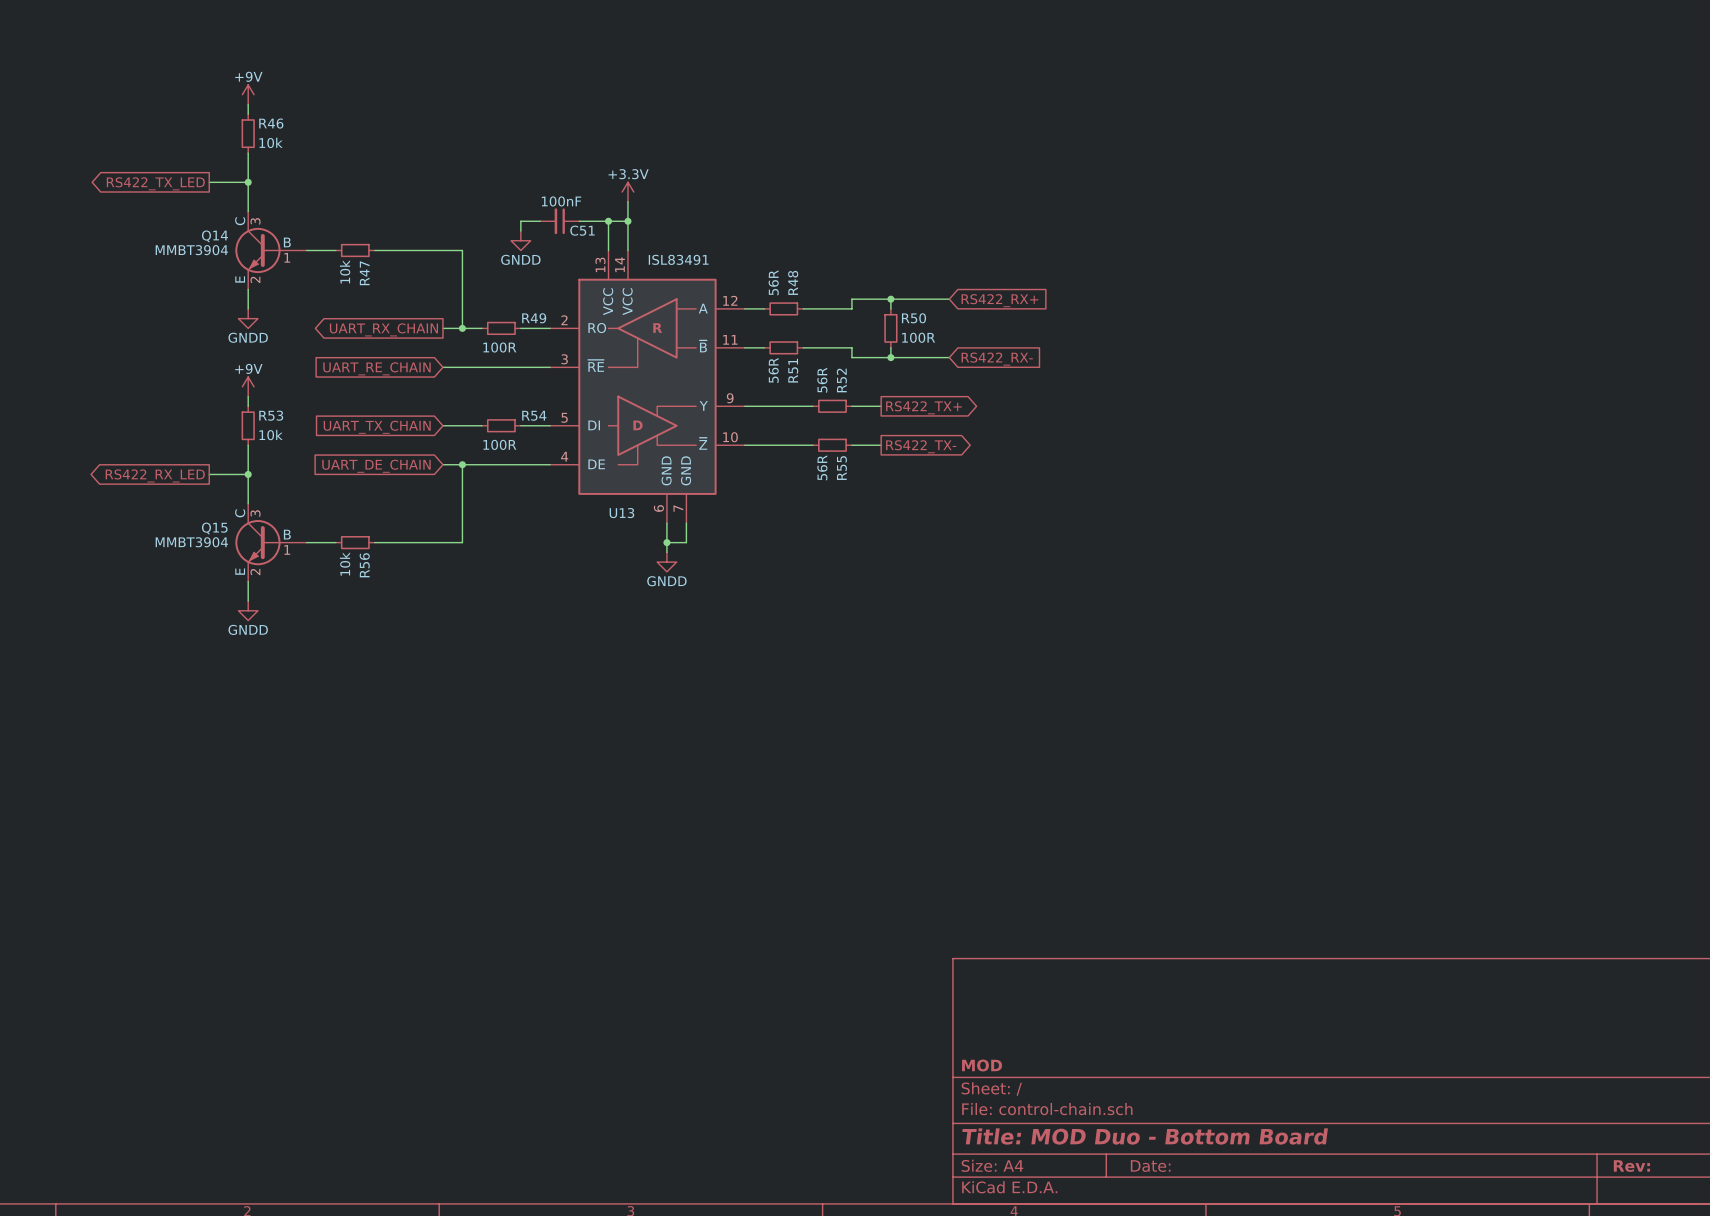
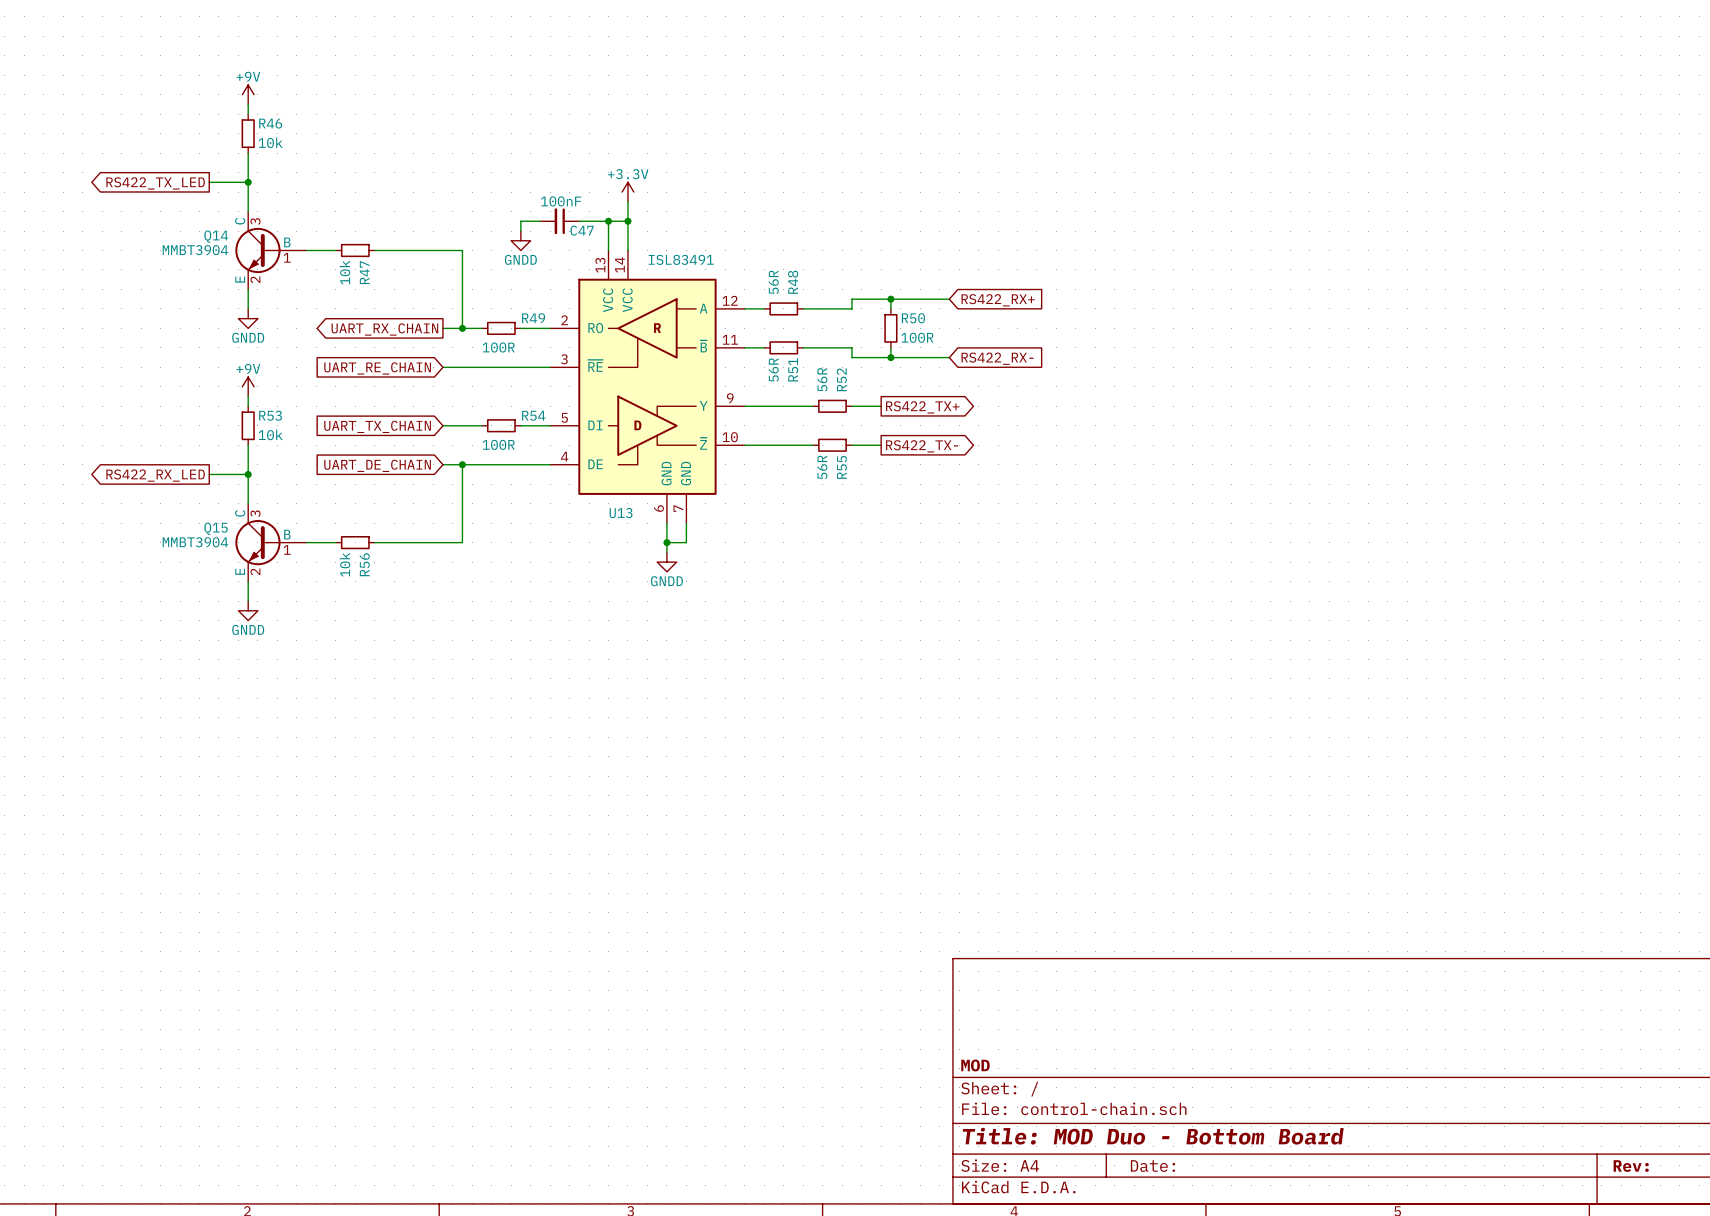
C51 name: C51 (582, 230) -> C47 (582, 230)

